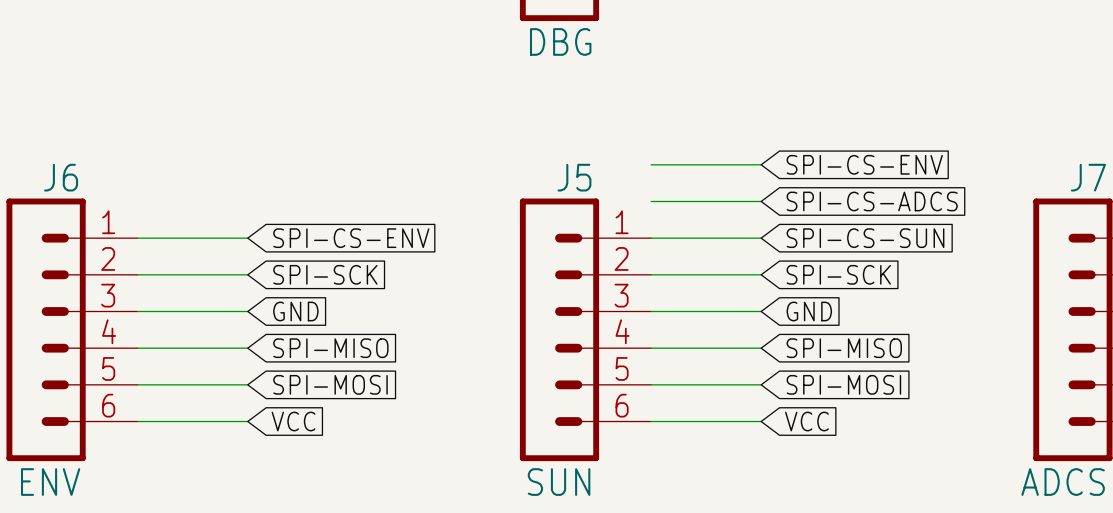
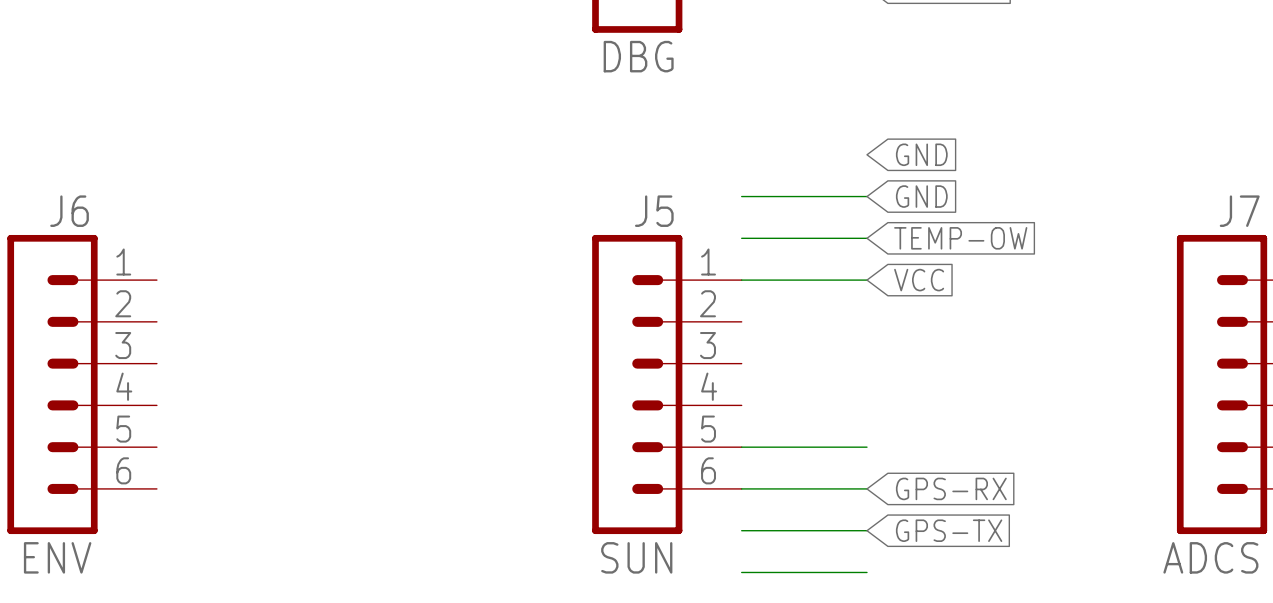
global label: SPI-CS-ENV (864, 164) -> GND (921, 196)
global label: SPI-CS-ADCS (872, 201) -> TEMP-OW (960, 238)
wire: (137, 238) (247, 238) -> none
global label: SPI-CS-ENV (351, 238) -> none
global label: SPI-CS-SUN (865, 238) -> VCC (919, 280)
wire: (137, 274) (247, 274) -> none
global label: SPI-SCK (325, 274) -> none
wire: (651, 274) (761, 274) -> none
global label: SPI-SCK (838, 274) -> none
wire: (137, 311) (247, 311) -> none
global label: GND (295, 311) -> none
wire: (651, 311) (761, 311) -> (741, 530) (867, 530)
global label position: GND (809, 311) -> GND (921, 154)
wire: (137, 348) (247, 348) -> none
global label: SPI-MISO (330, 348) -> none
wire: (651, 348) (761, 348) -> (741, 572) (867, 572)
global label: SPI-MISO (844, 348) -> none
wire: (137, 384) (247, 384) -> none
global label: SPI-MOSI (330, 384) -> none
global label: SPI-MOSI (843, 384) -> none
wire: (137, 421) (247, 421) -> none
global label: VCC (293, 421) -> none
global label: VCC (806, 421) -> GPS-RX (951, 488)
global label: none -> GPS-TX (949, 530)

